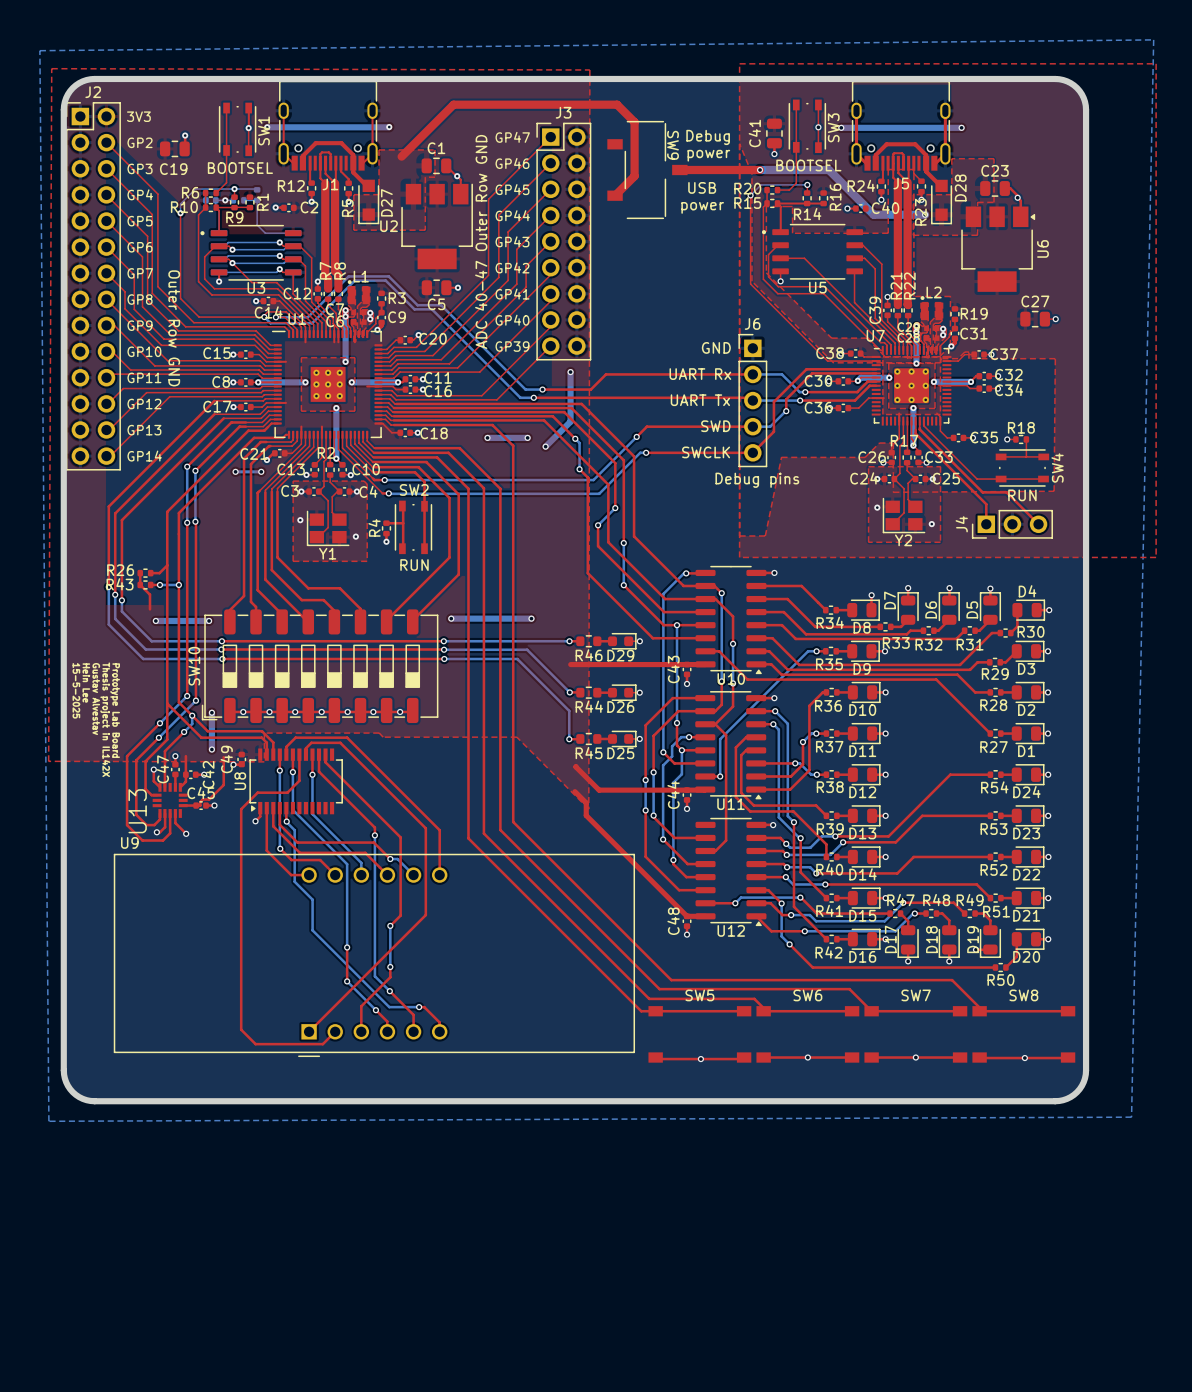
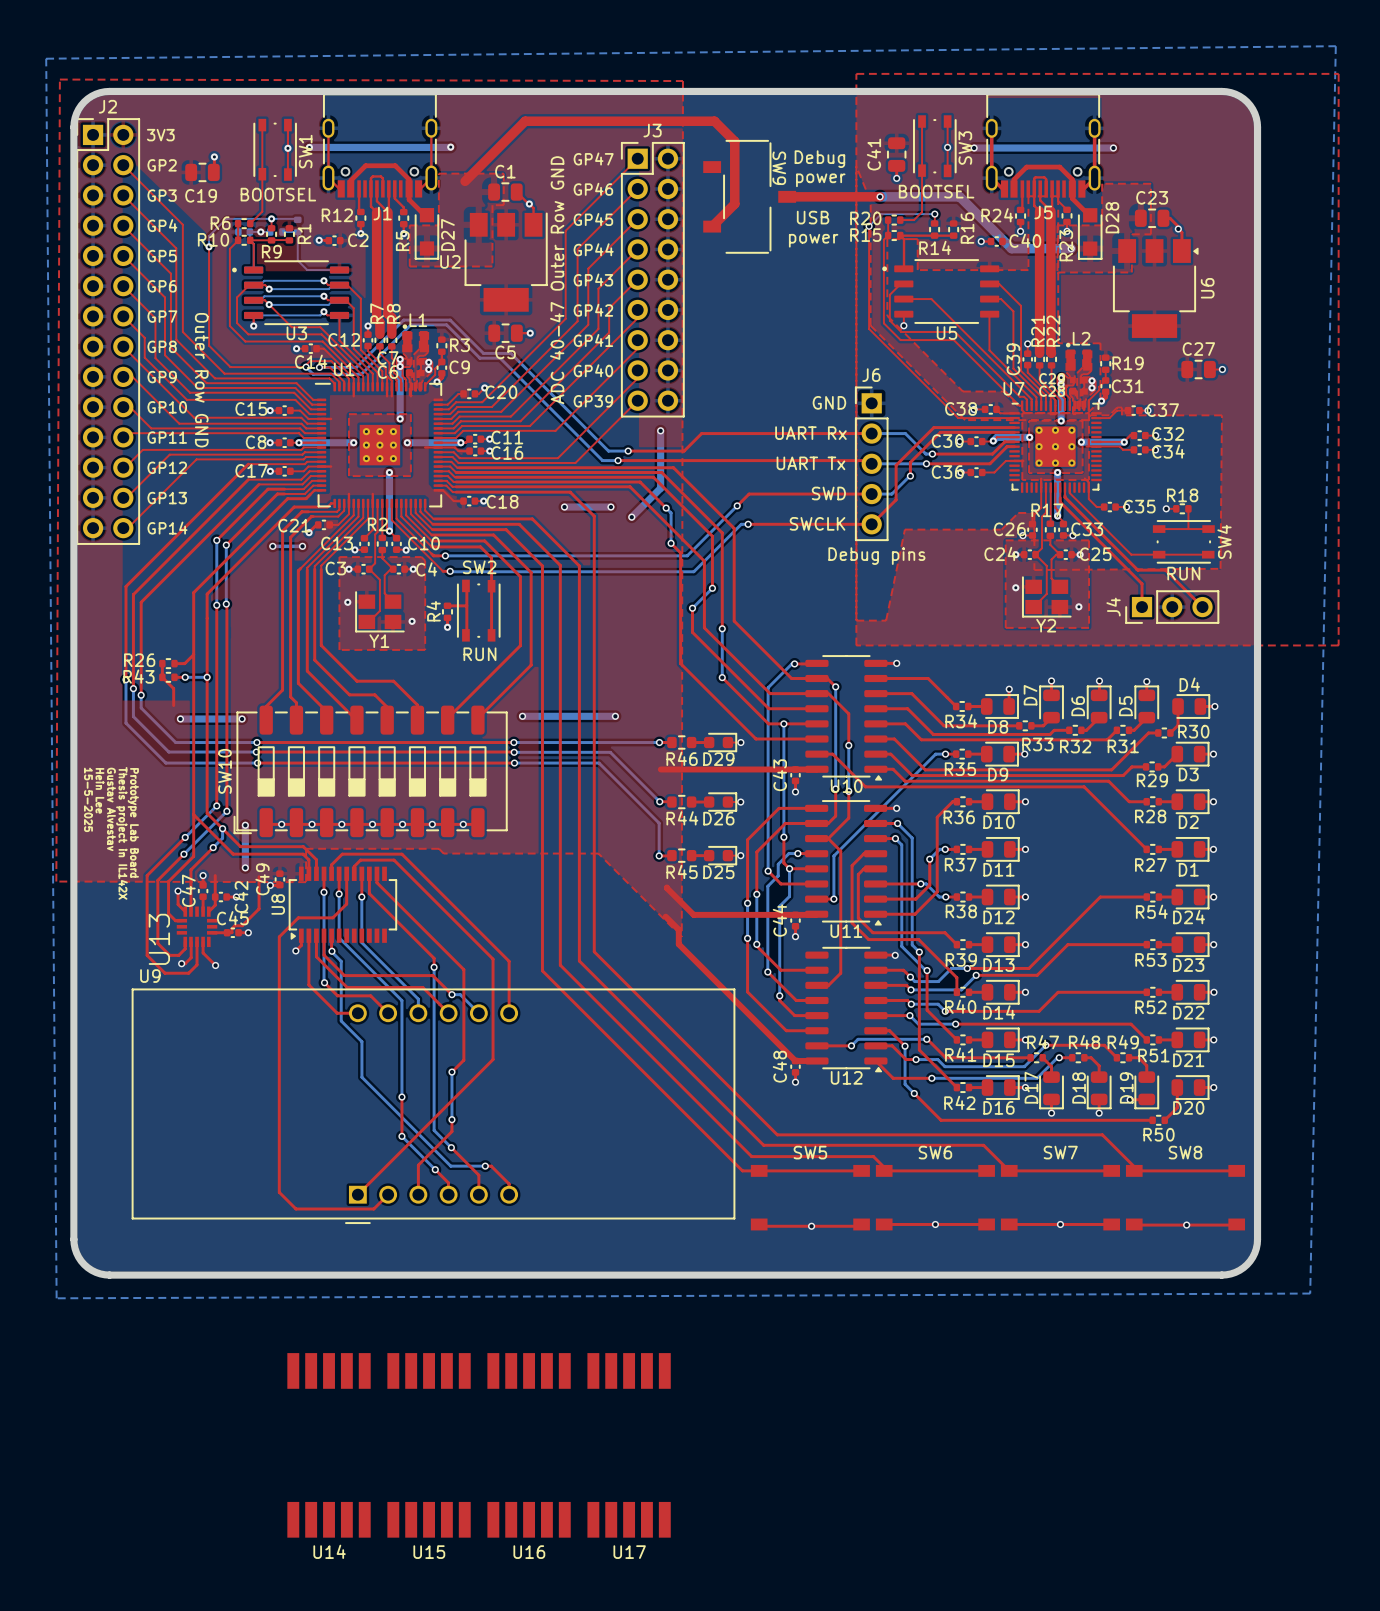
U14: none -> (329, 1445)
U15: none -> (429, 1445)
U16: none -> (529, 1445)
U17: none -> (629, 1445)

